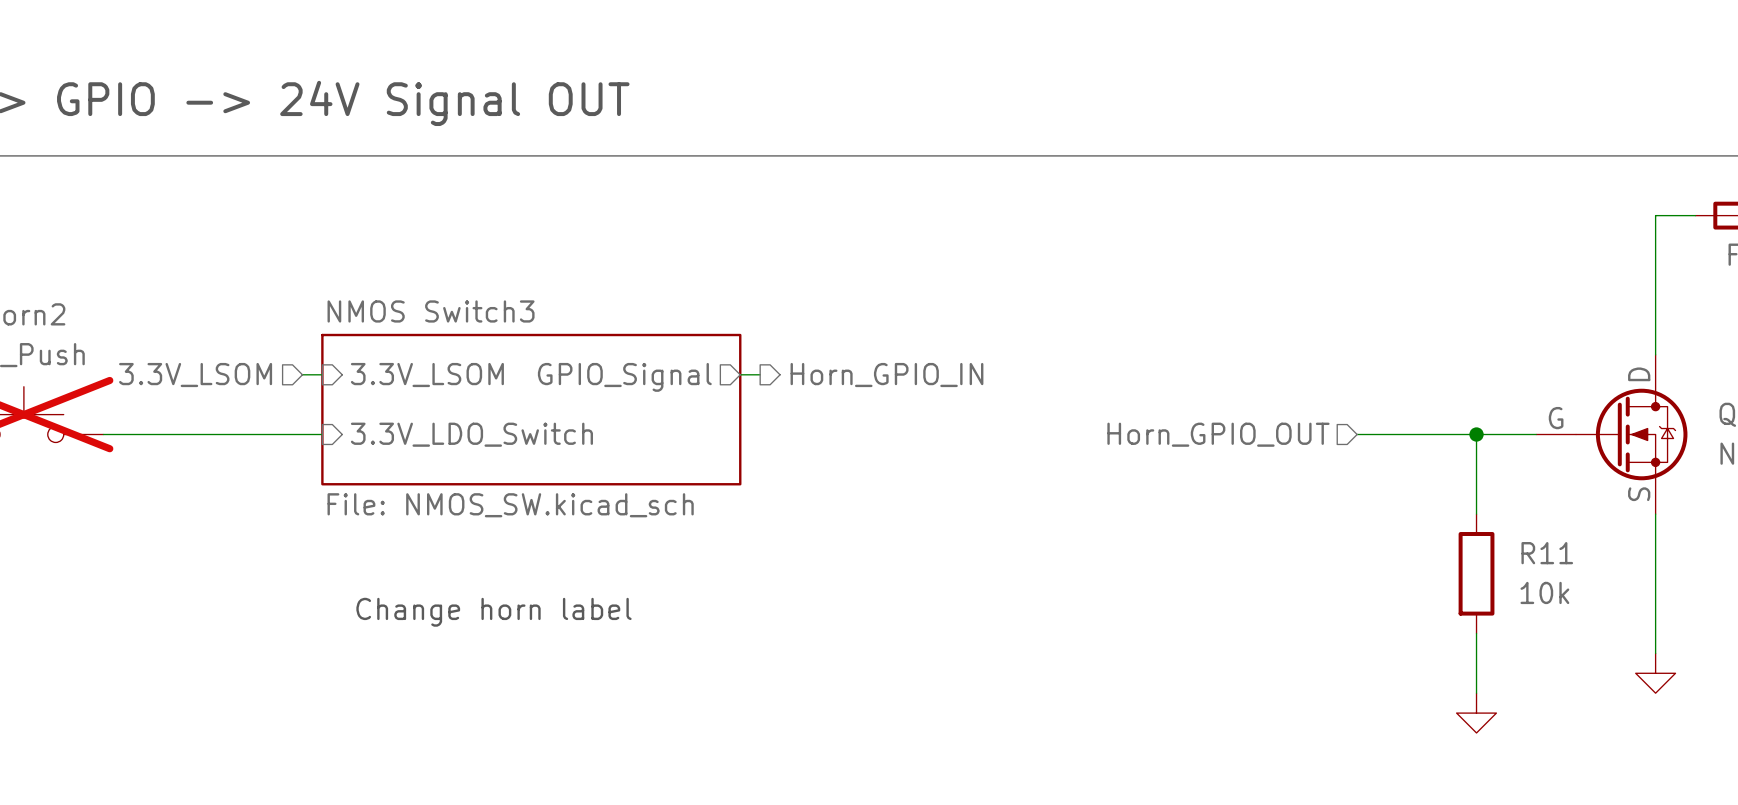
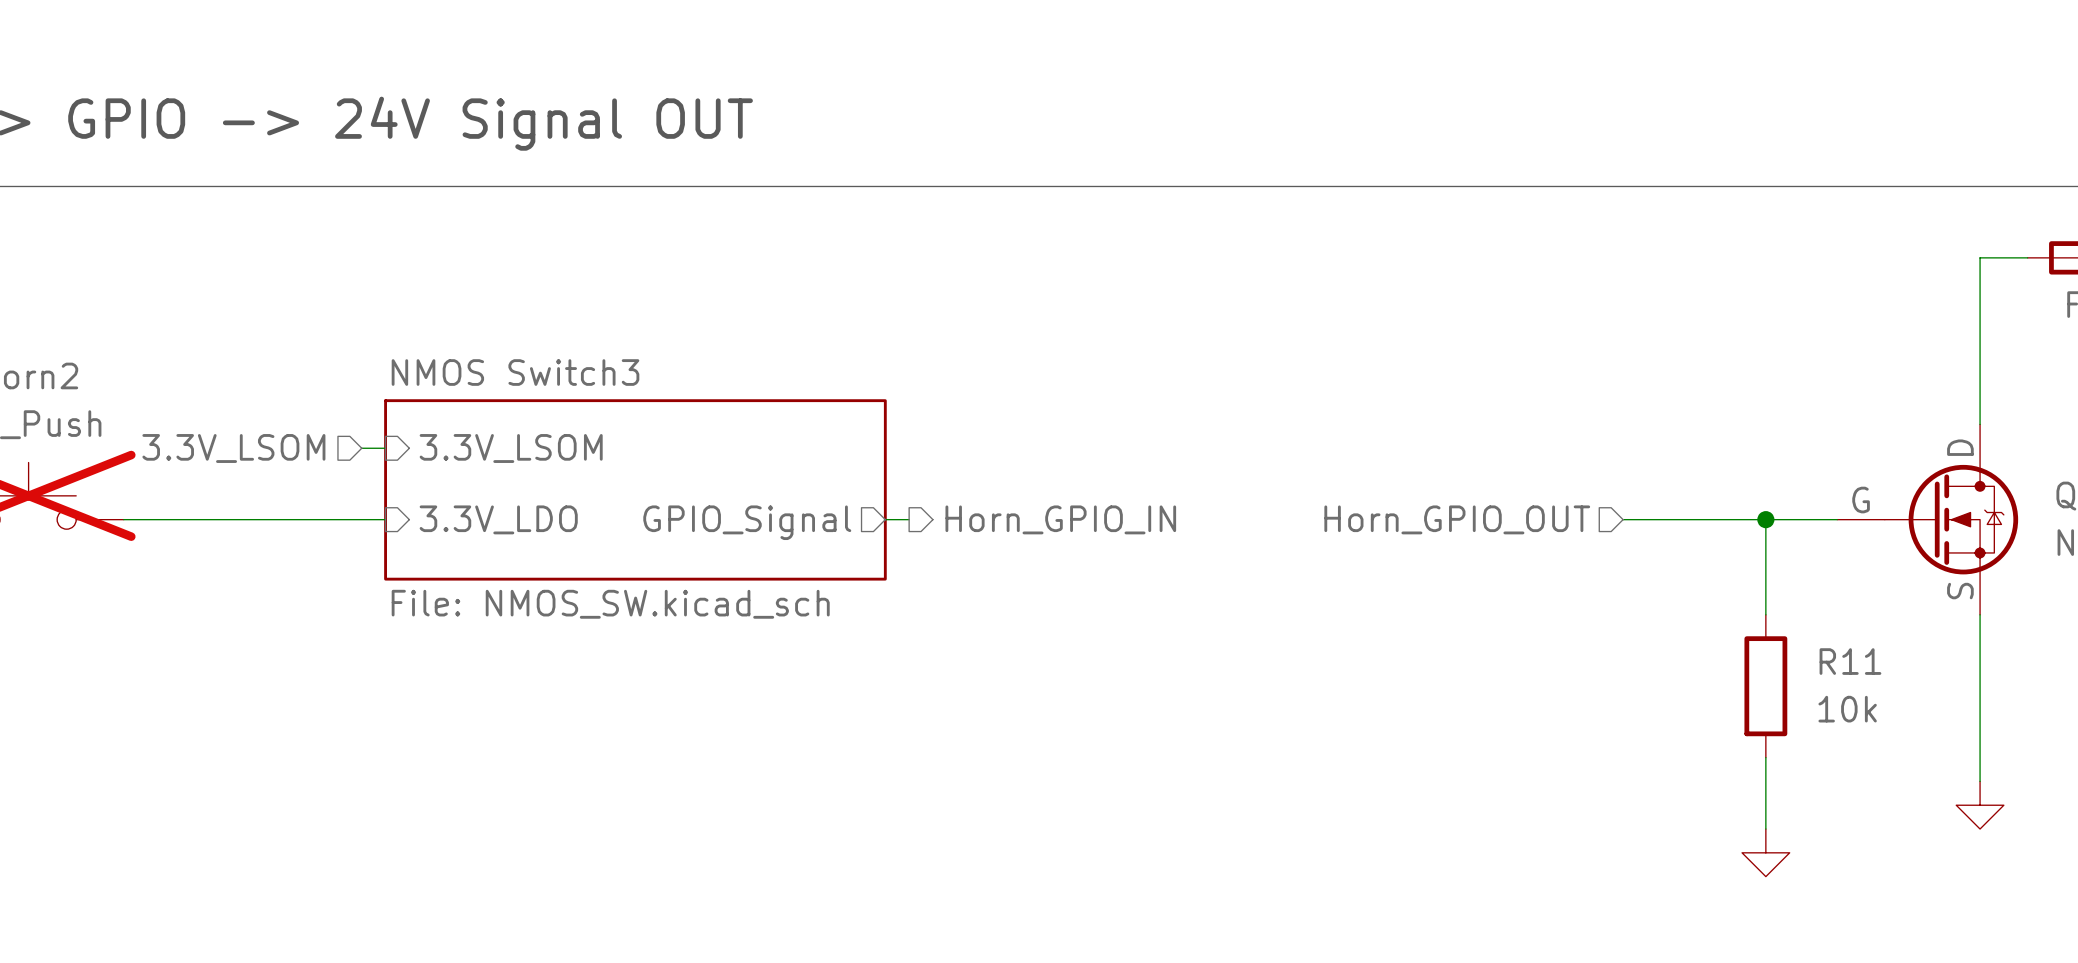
wire: (740, 374) (760, 374) -> (885, 519) (909, 519)
hierarchical label position: Horn_GPIO_IN (886, 375) -> Horn_GPIO_IN (1060, 519)
sheet pin position: GPIO_Signal (624, 377) -> GPIO_Signal (747, 522)
sheet pin: 3.3V_LDO_Switch (471, 434) -> 3.3V_LDO (498, 519)
text: Change horn label (493, 612) -> none

